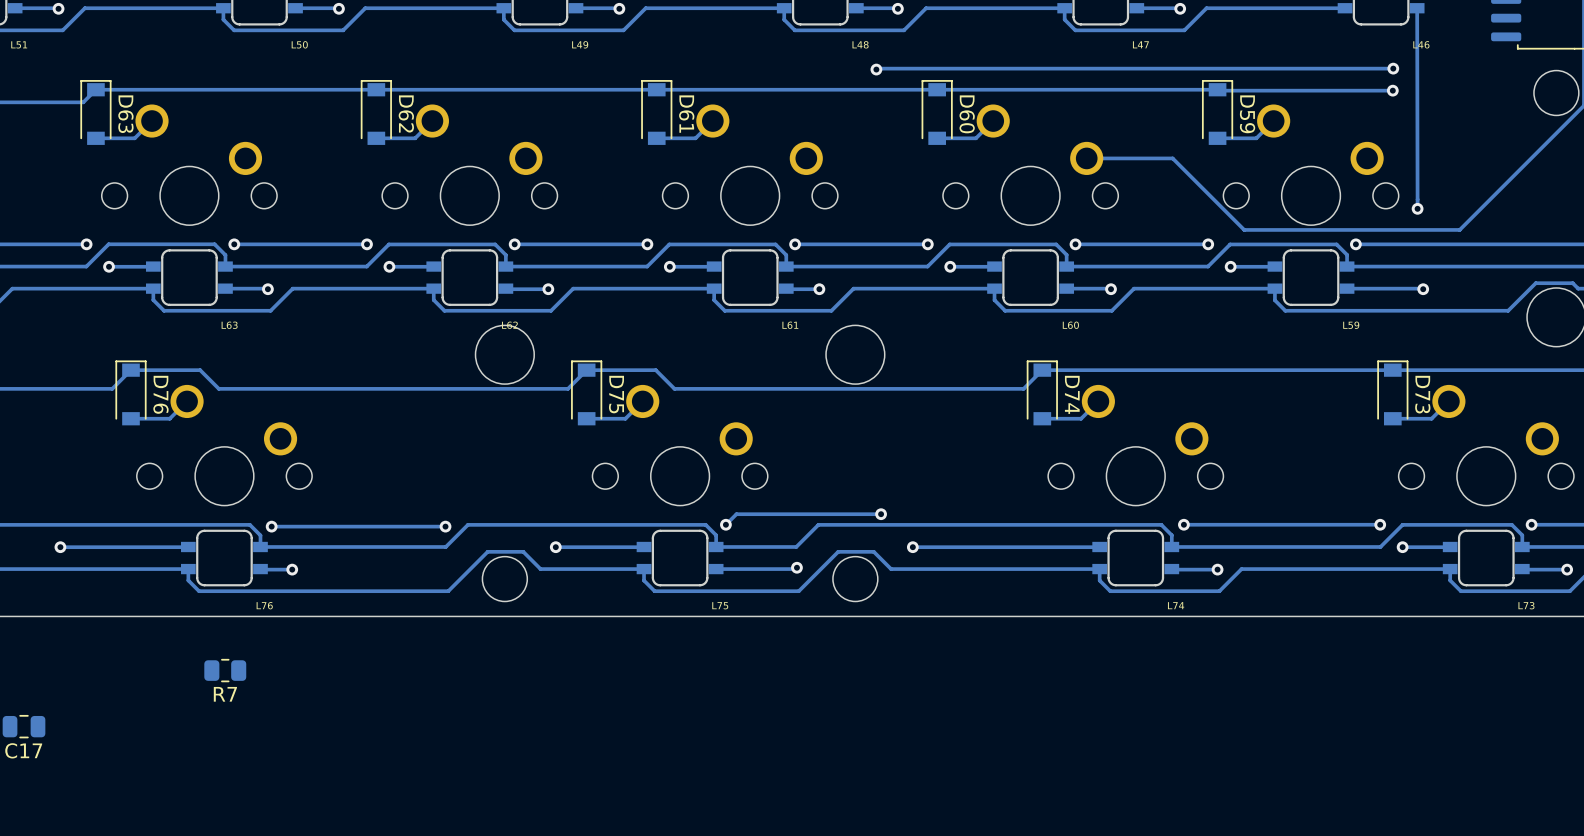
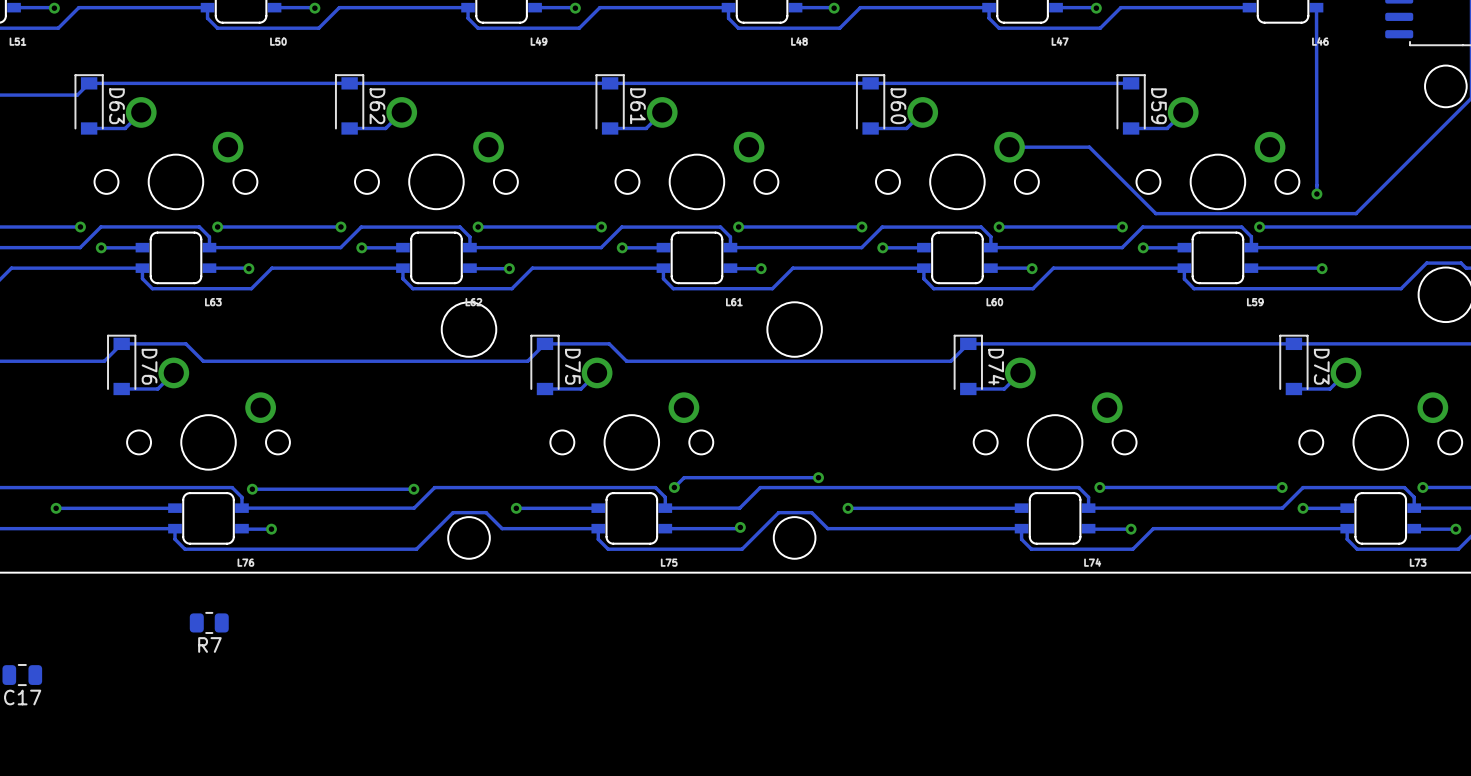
track: (1393, 68) (876, 69) -> none
via: (1393, 68) -> none
via: (876, 69) -> none
track: (1217, 89) (1392, 90) -> none
via: (1392, 90) -> none

